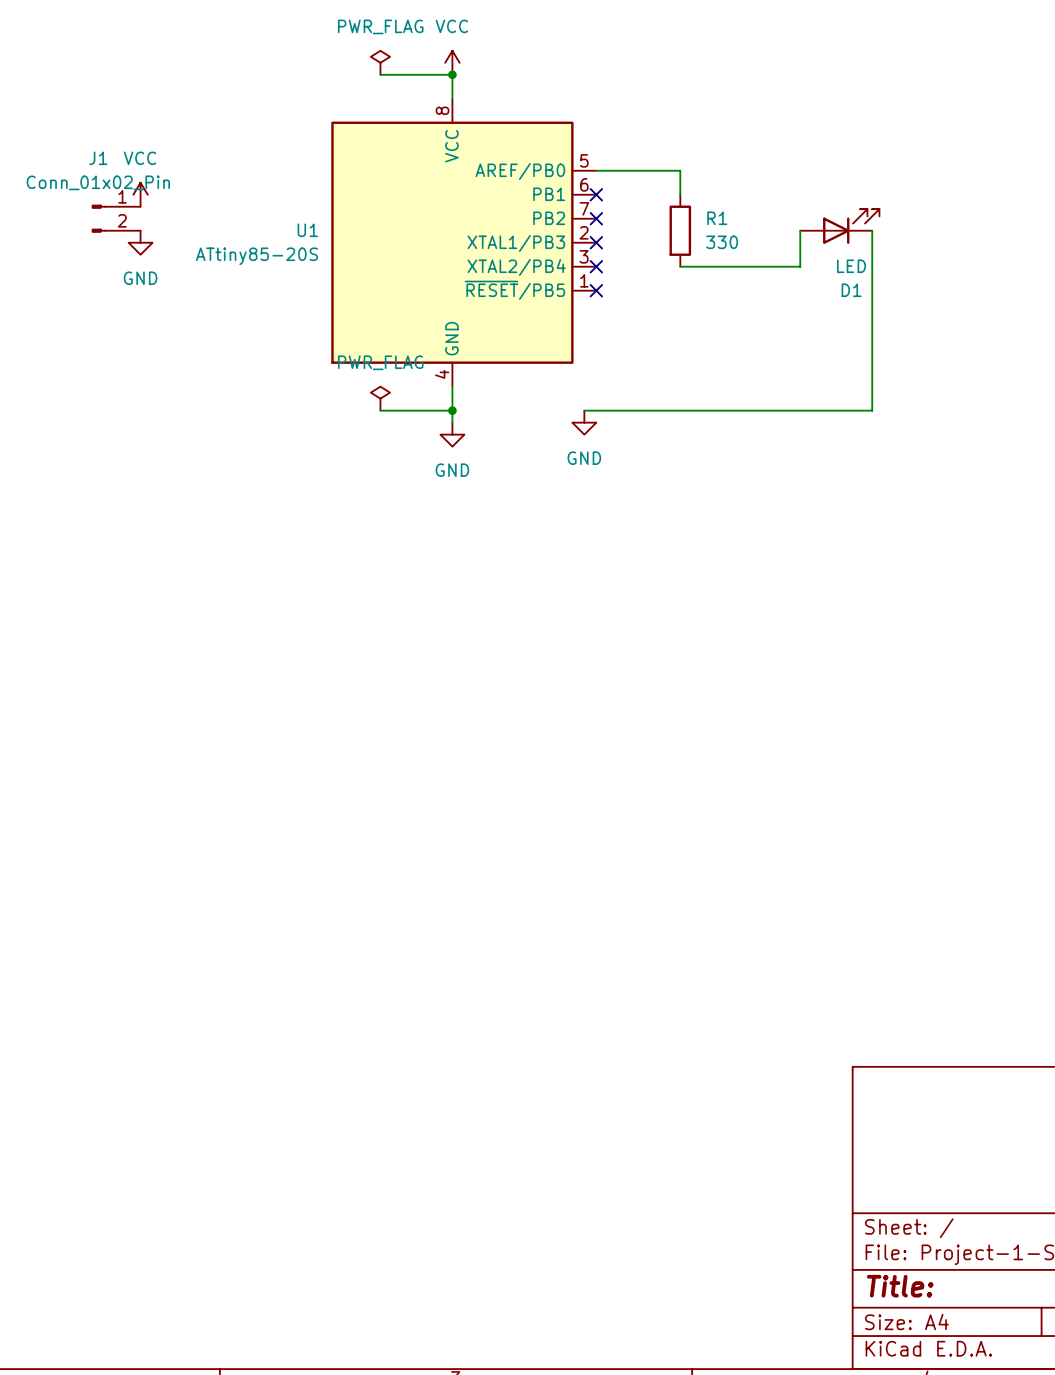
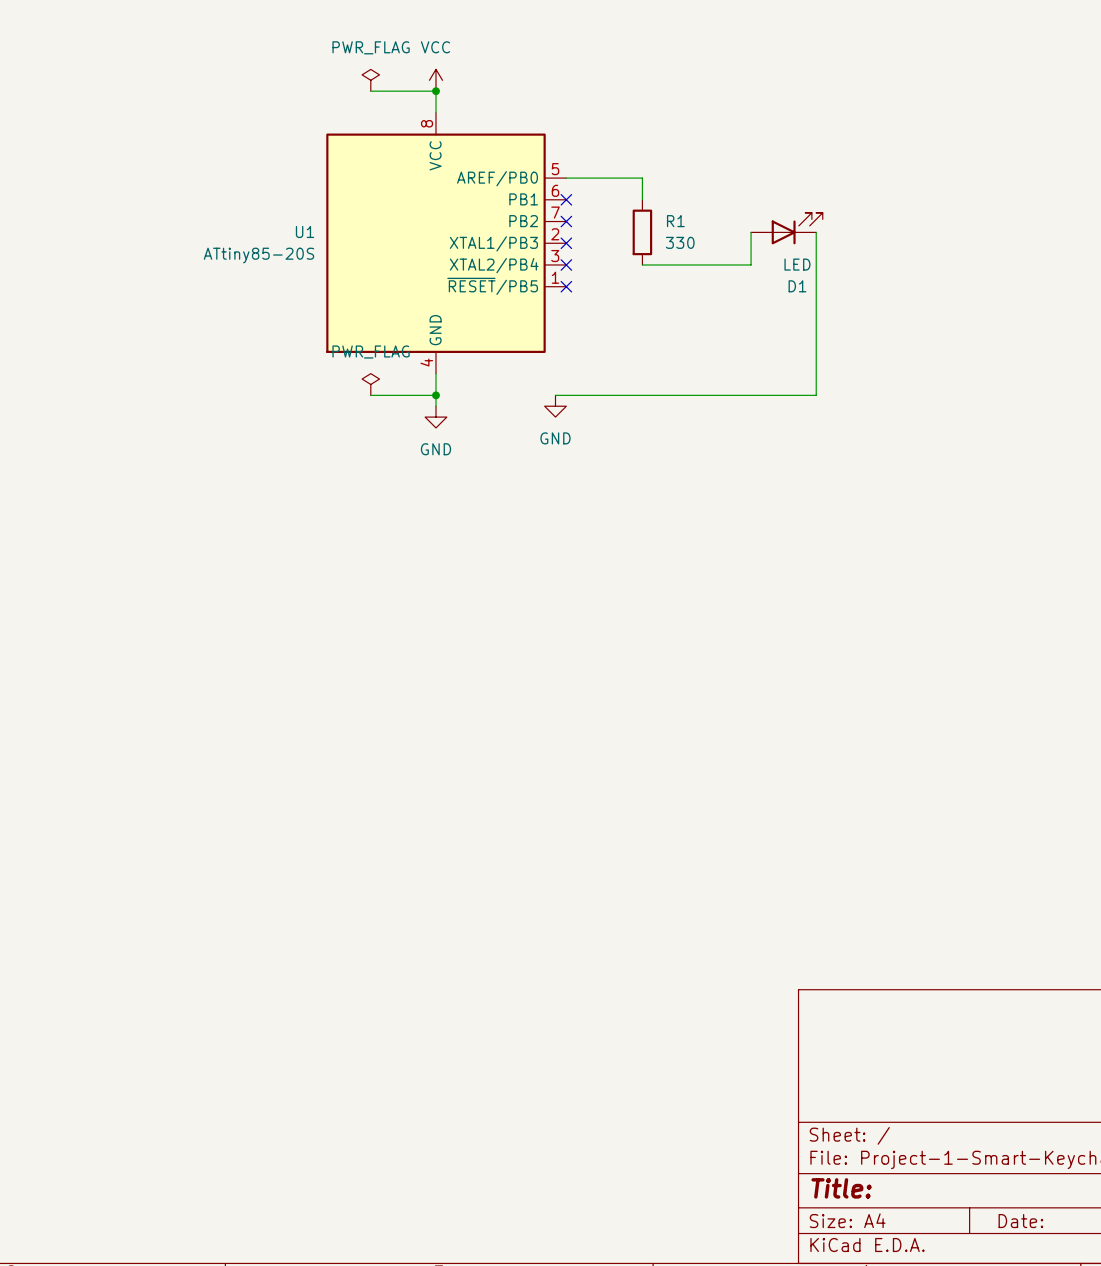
power symbol: VCC (140, 194) -> none
J1: Conn_01x02_Pin (116, 218) -> none
power symbol: GND (140, 242) -> none

